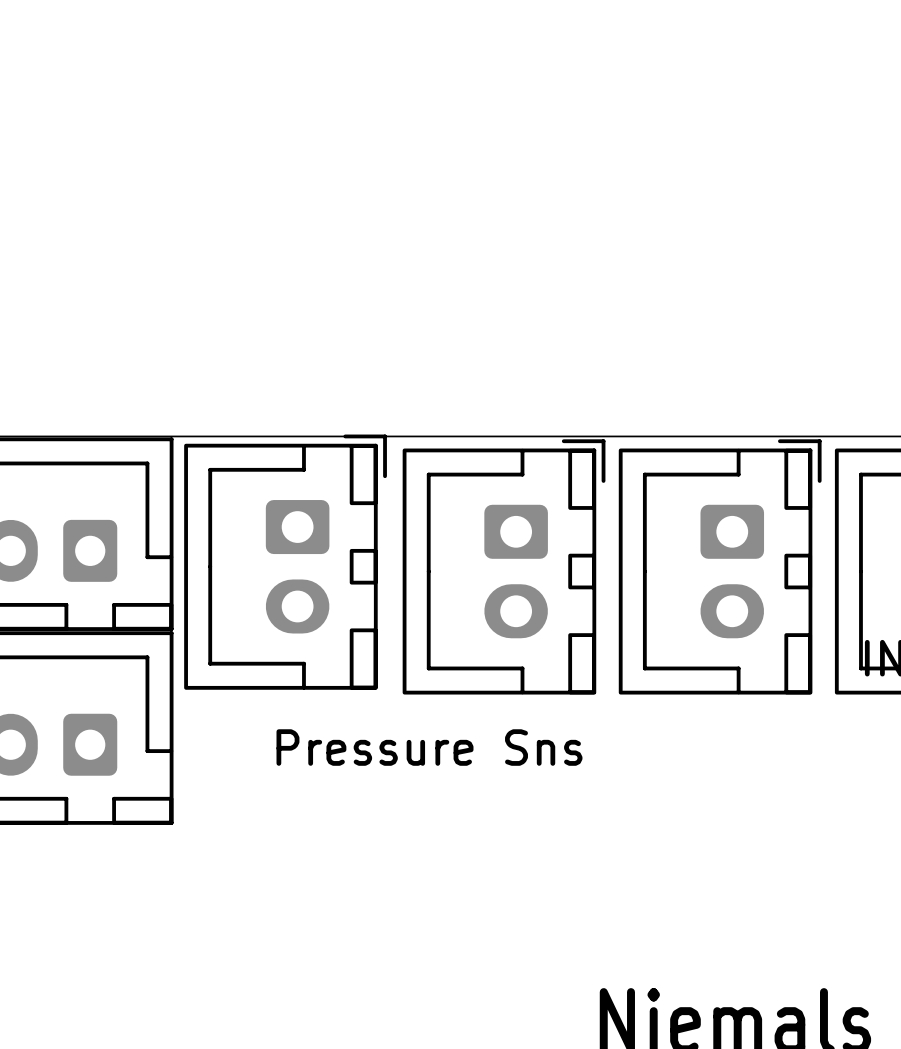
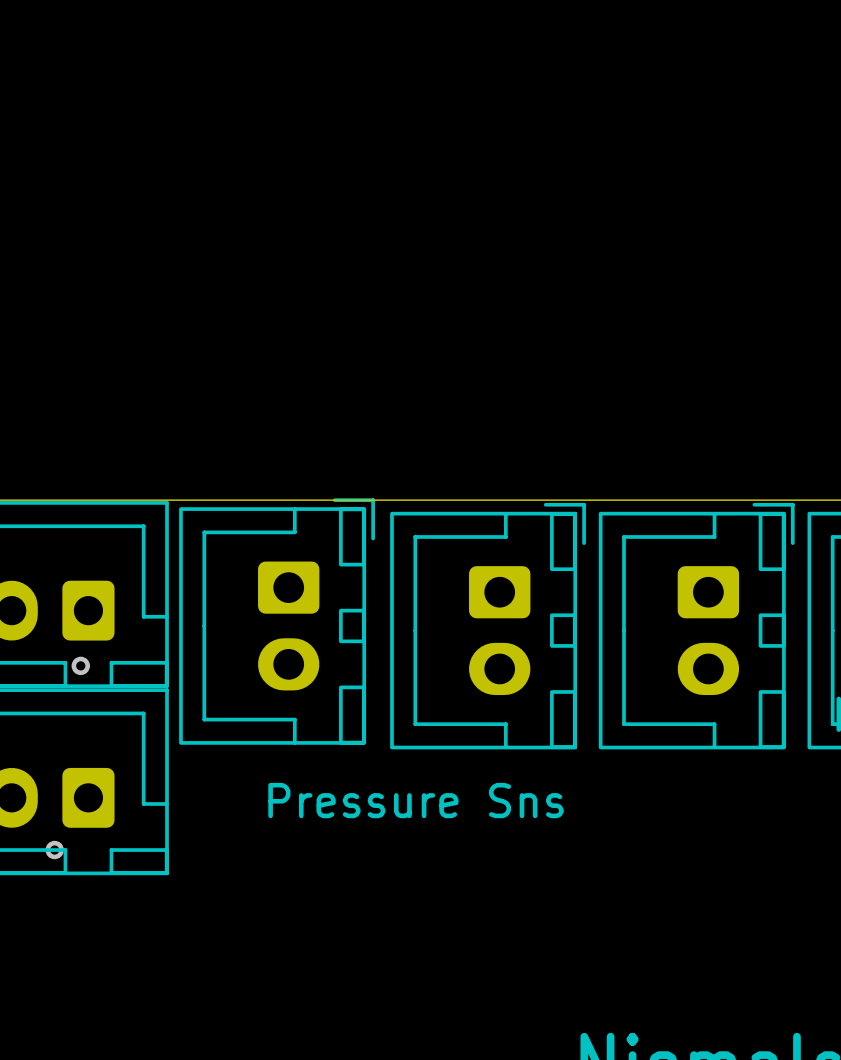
via: none -> (80, 665)
via: none -> (54, 850)

